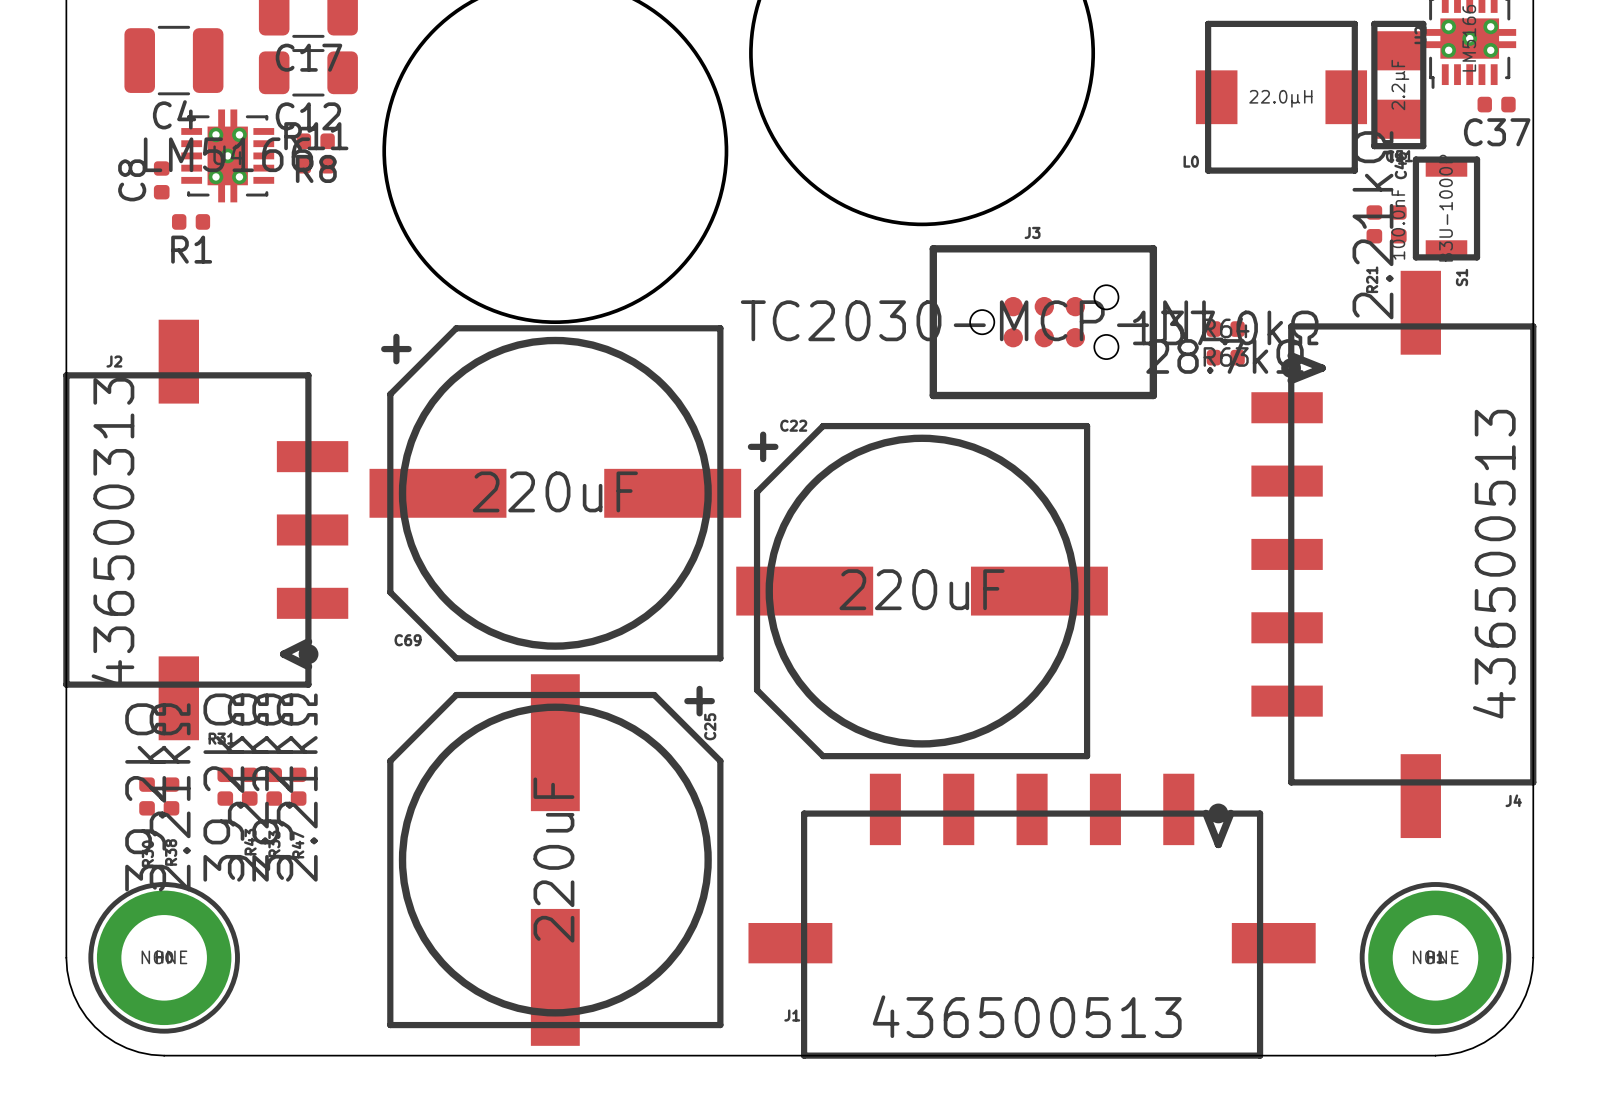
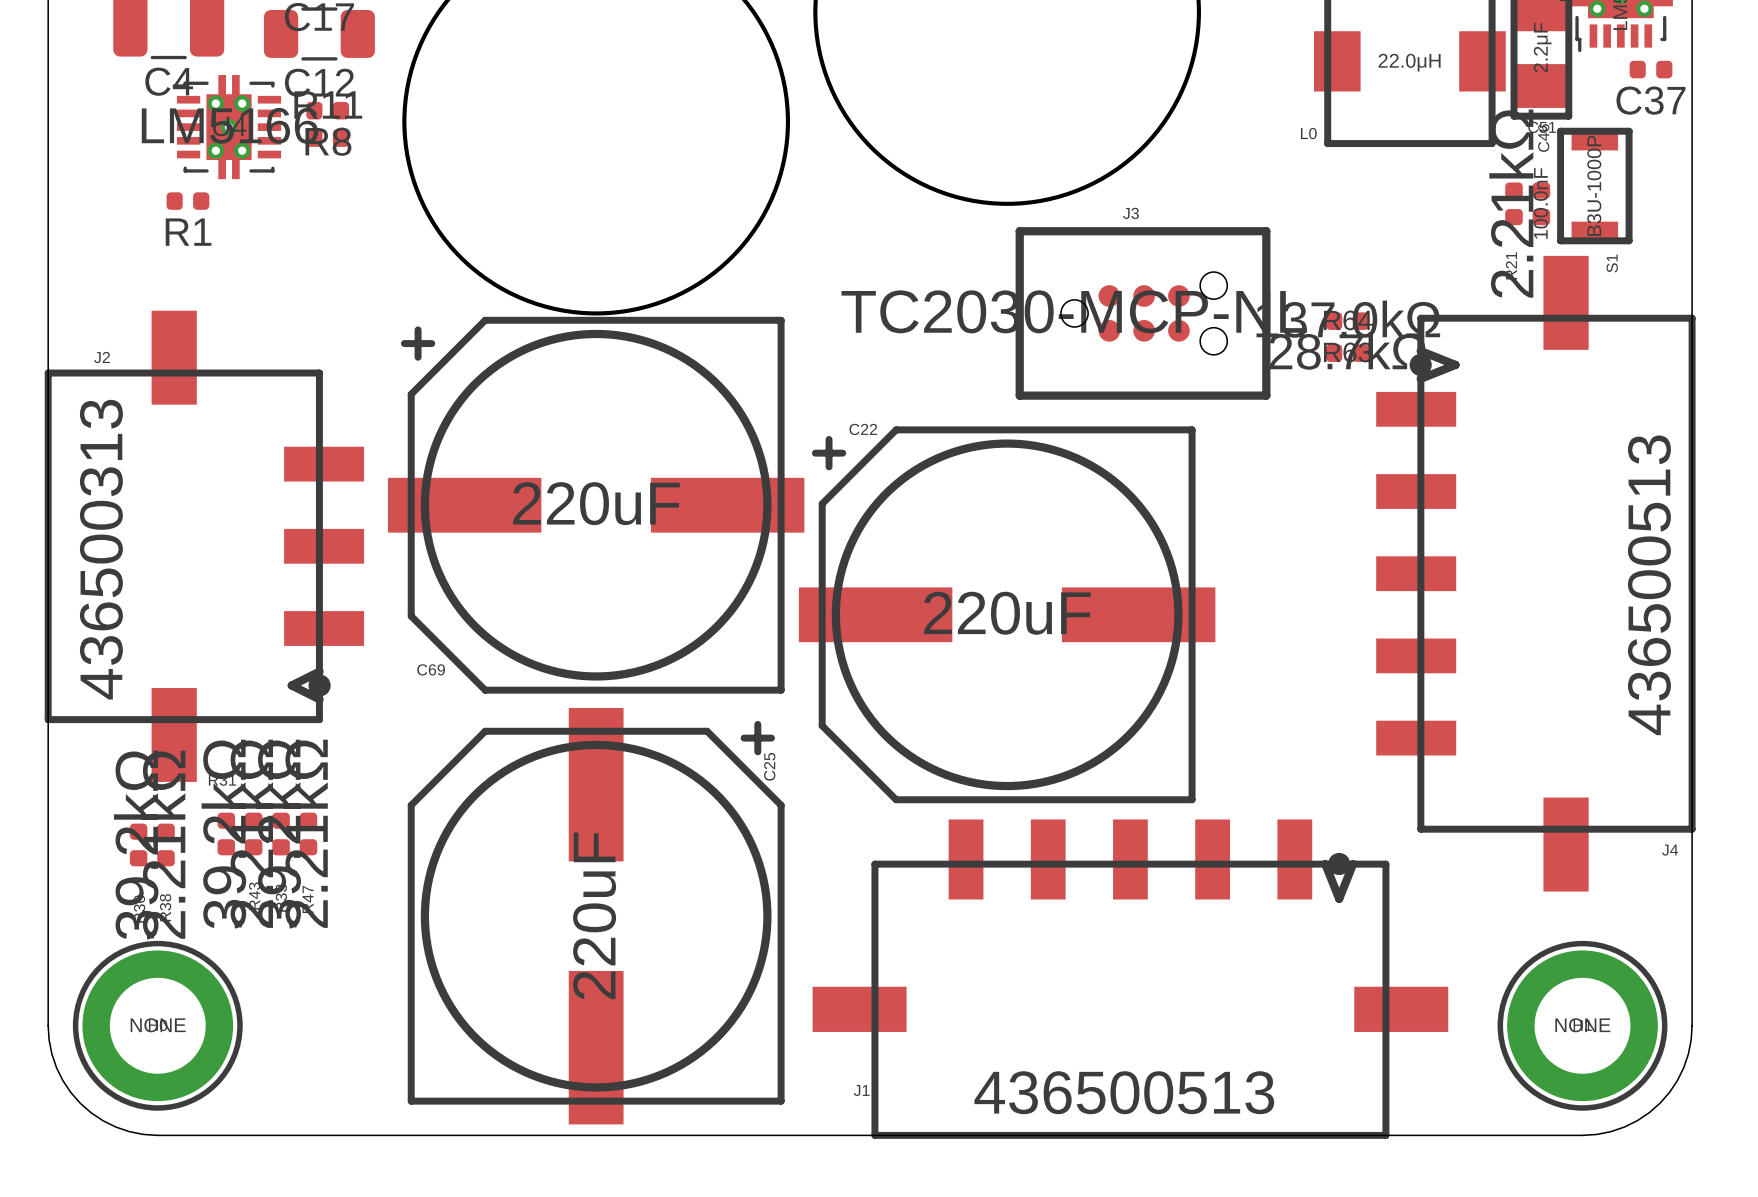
C8: (161, 180) -> none

